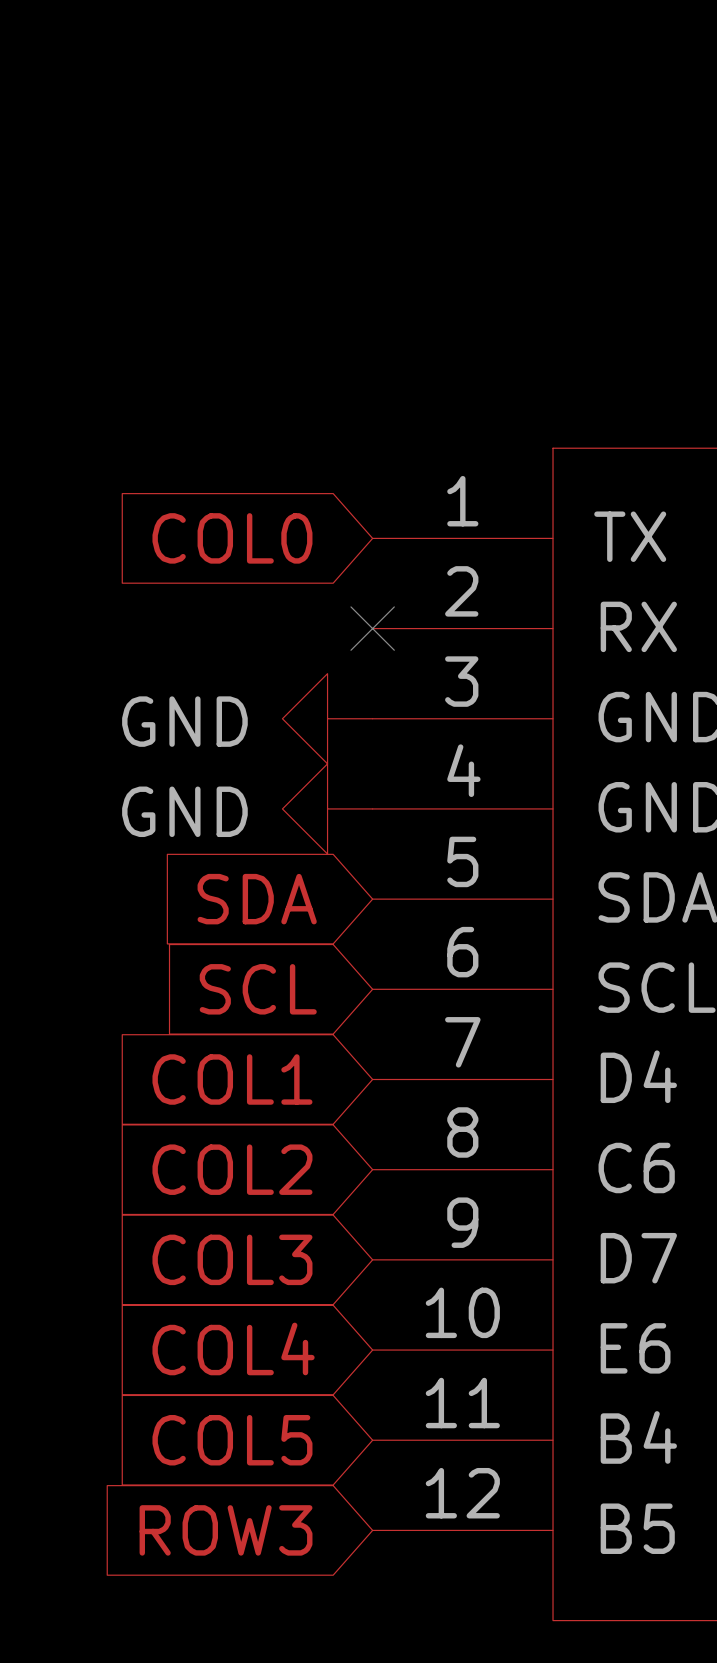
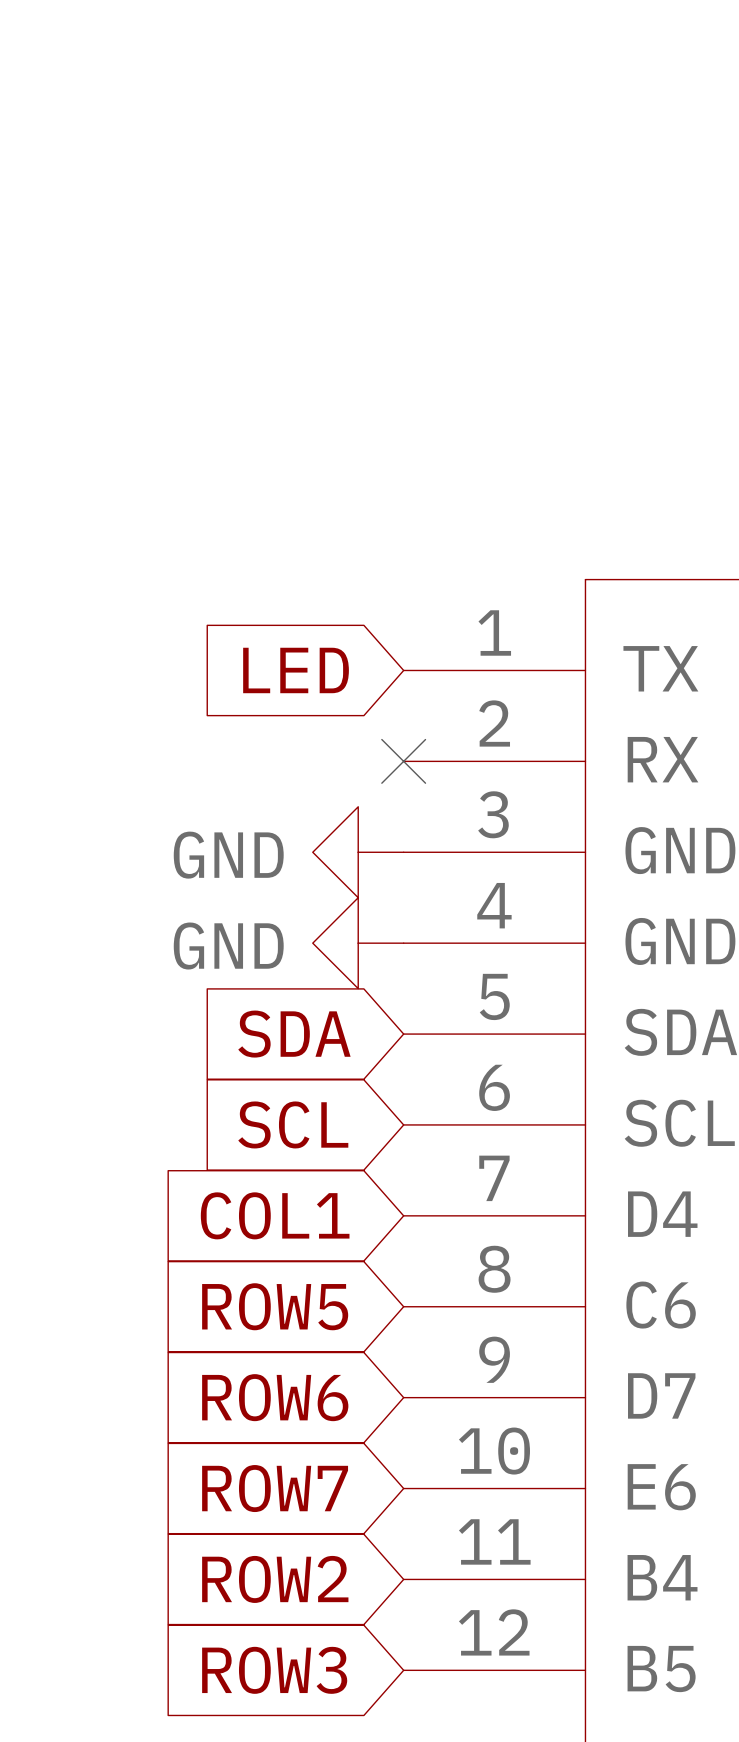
global label: COL0 (232, 538) -> LED (296, 670)
global label: COL2 (232, 1169) -> ROW5 (275, 1306)
global label: COL3 (232, 1259) -> ROW6 (275, 1397)
global label: COL4 (233, 1348) -> ROW7 (275, 1488)
global label: COL5 (232, 1440) -> ROW2 (275, 1579)

